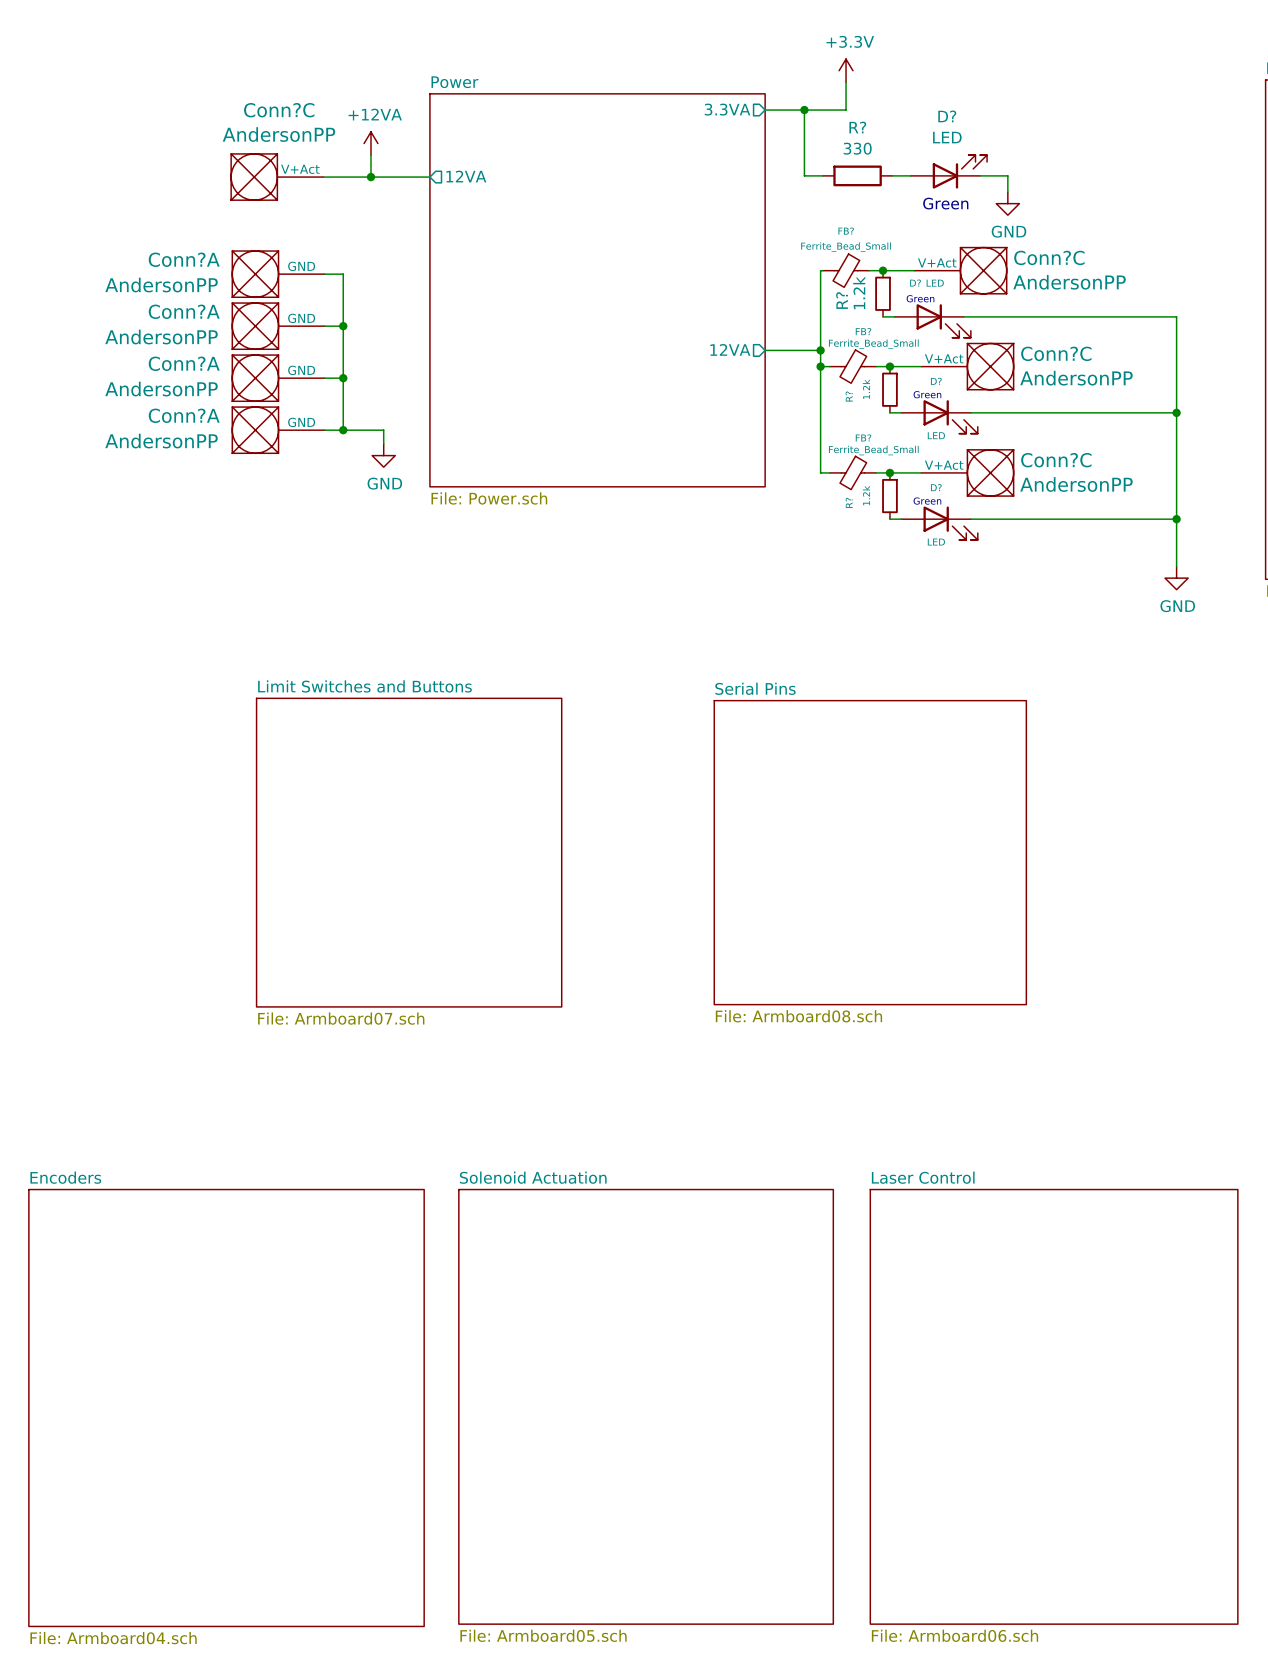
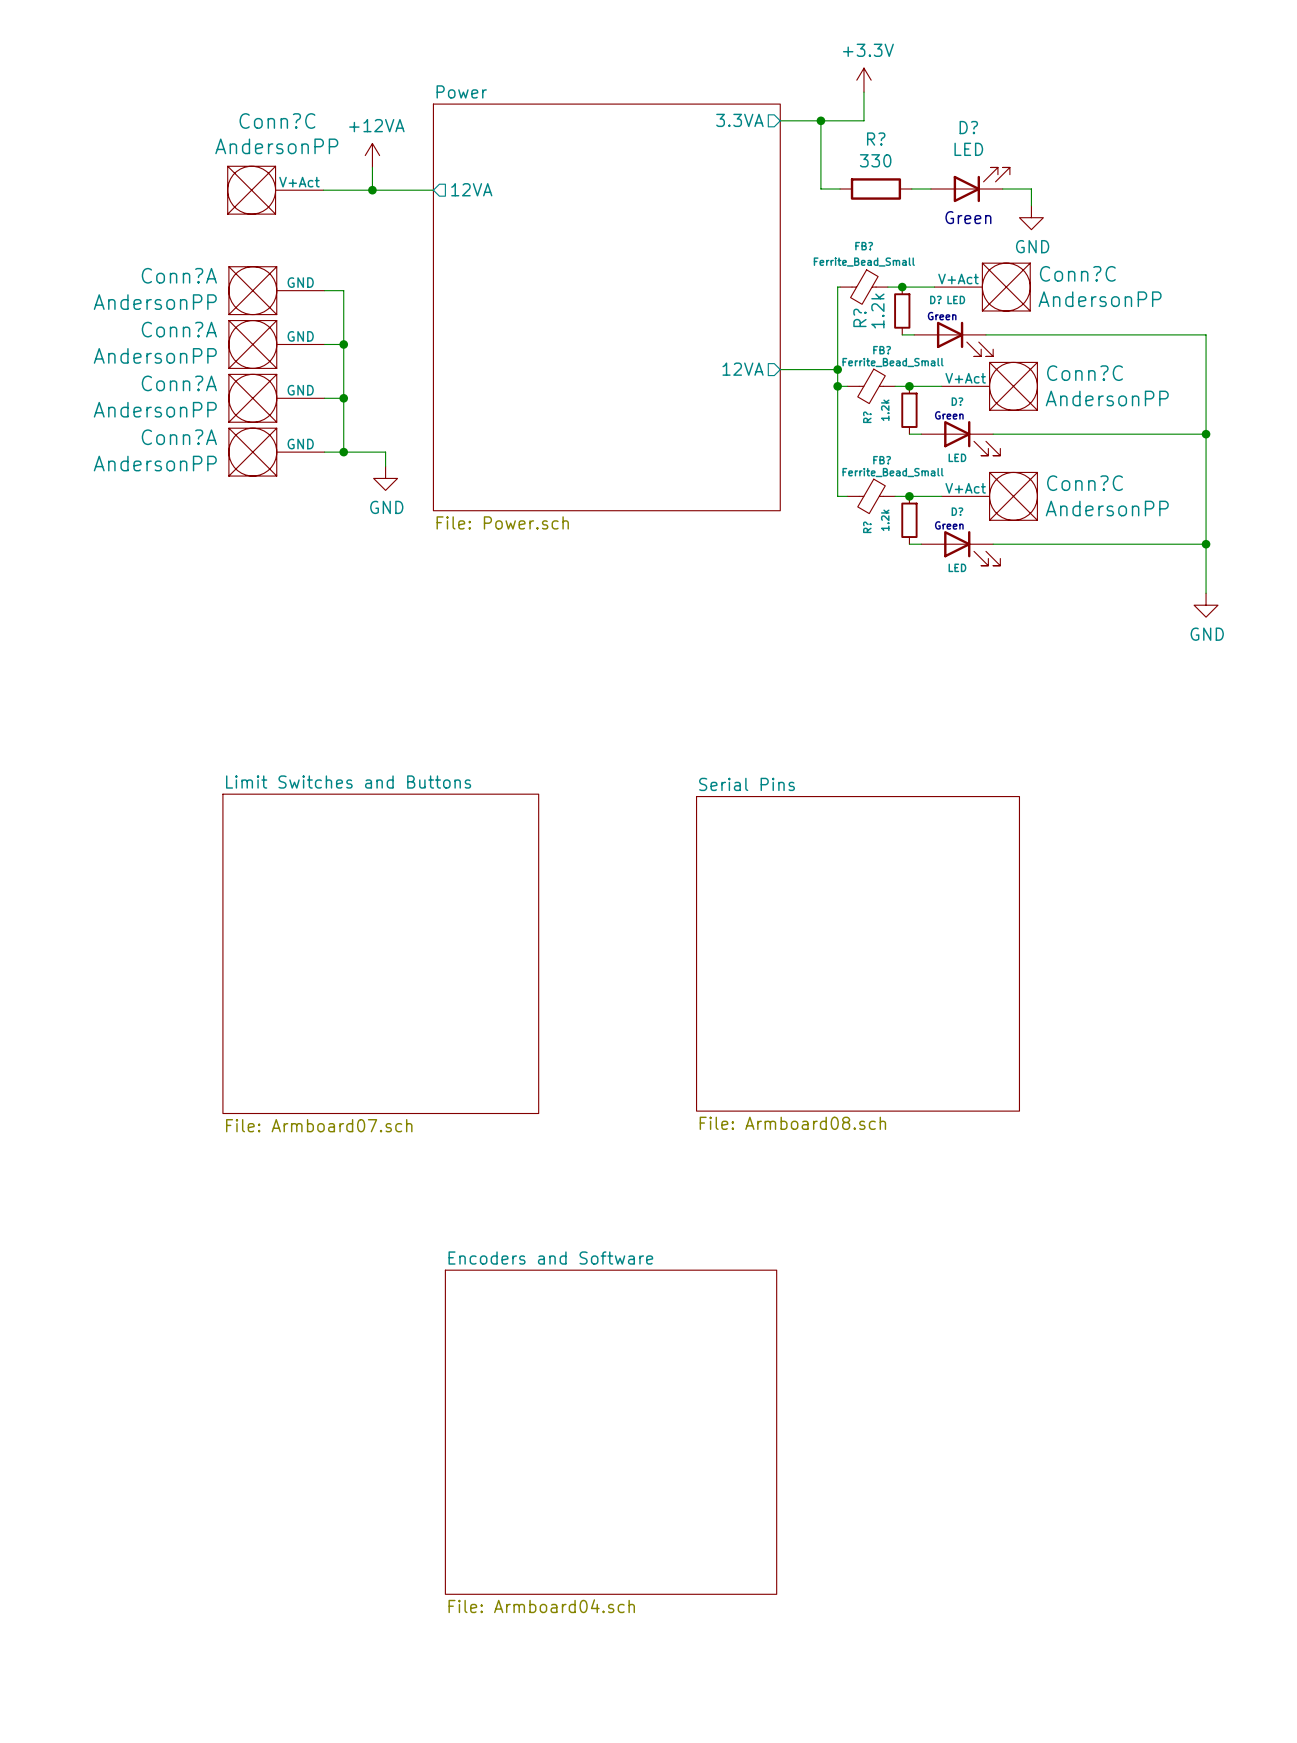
sheet Limit Switches and Buttons position: (409, 852) -> (380, 953)
sheet Serial Pins position: (870, 852) -> (858, 953)
sheet Encoders and Software: none -> File: Armboard04.sch (611, 1432)
sheet Solenoid Actuation: File: Armboard05.sch (646, 1406) -> none
sheet Laser Control: File: Armboard06.sch (1054, 1406) -> none
sheet Encoders: File: Armboard04.sch (226, 1408) -> none

